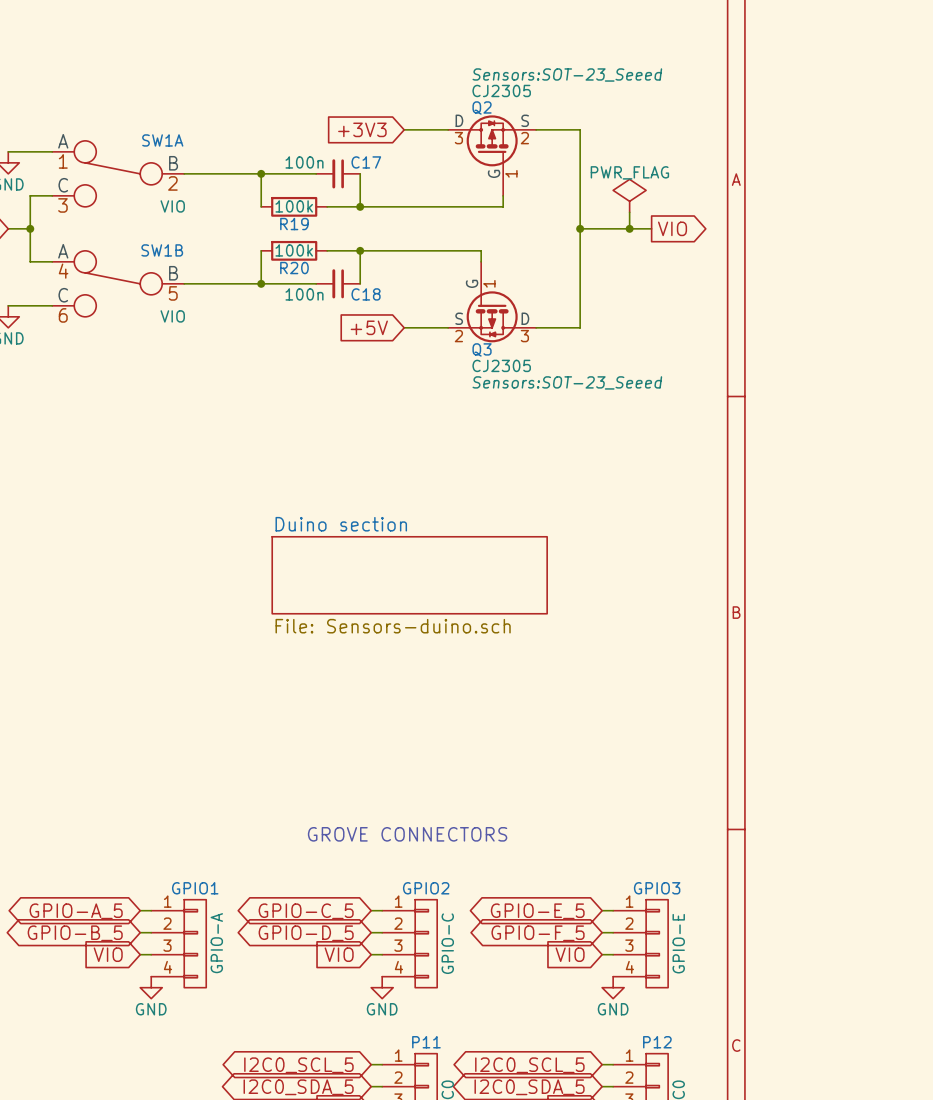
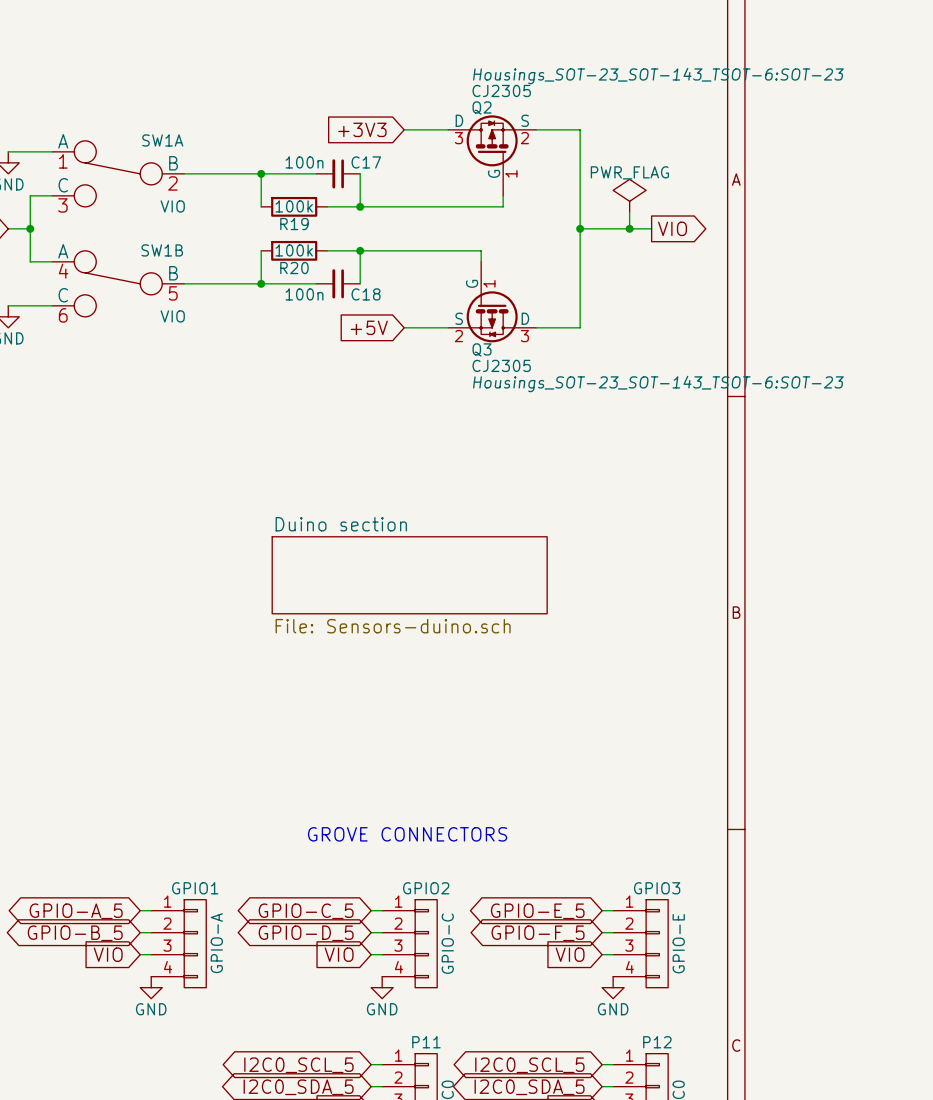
Q2 text: Sensors:SOT-23_Seeed (567, 75) -> Housings_SOT-23_SOT-143_TSOT-6:SOT-23 (658, 76)
Q3 text: Sensors:SOT-23_Seeed (567, 382) -> Housings_SOT-23_SOT-143_TSOT-6:SOT-23 (658, 383)

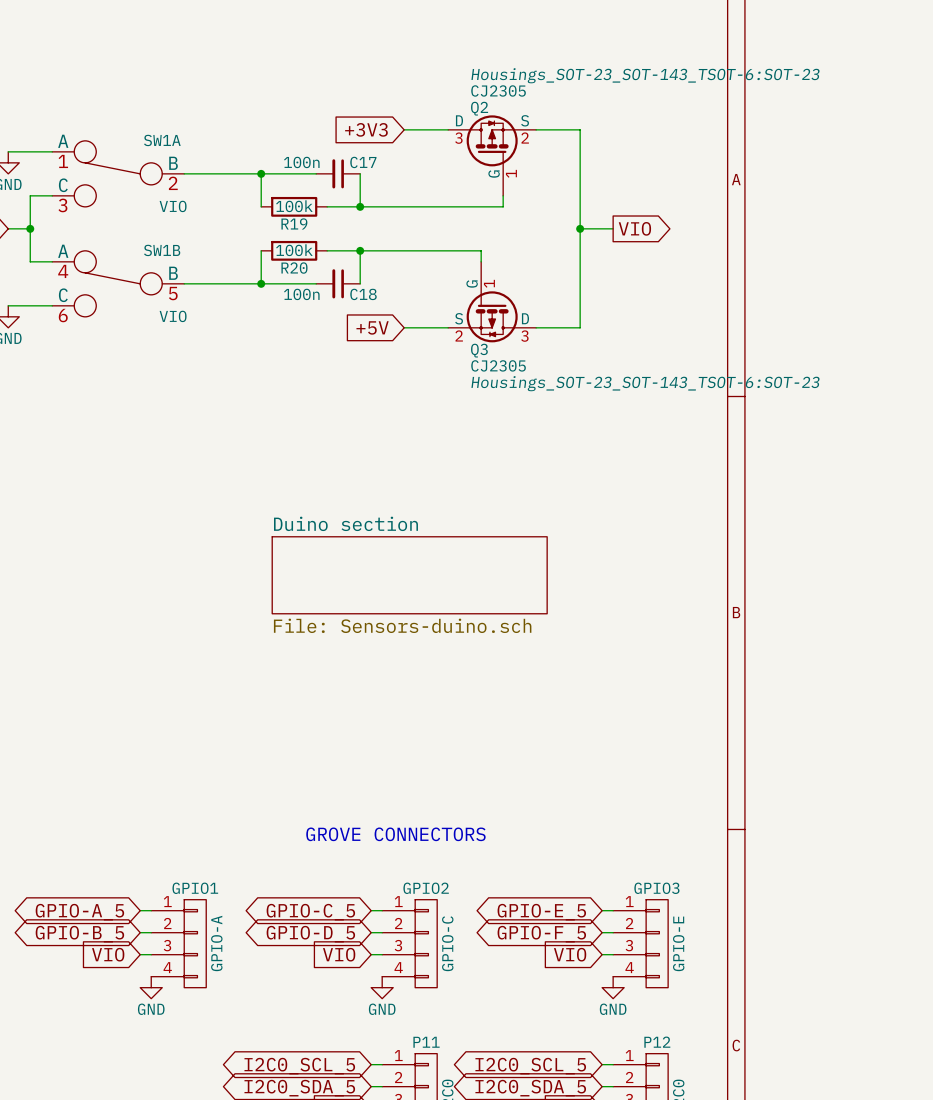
power symbol: PWR_FLAG (629, 195) -> none
wire: (629, 212) (629, 228) -> none
wire: (613, 228) (651, 228) -> none
junction: (629, 228) -> none
global label position: VIO (672, 228) -> VIO (634, 228)

